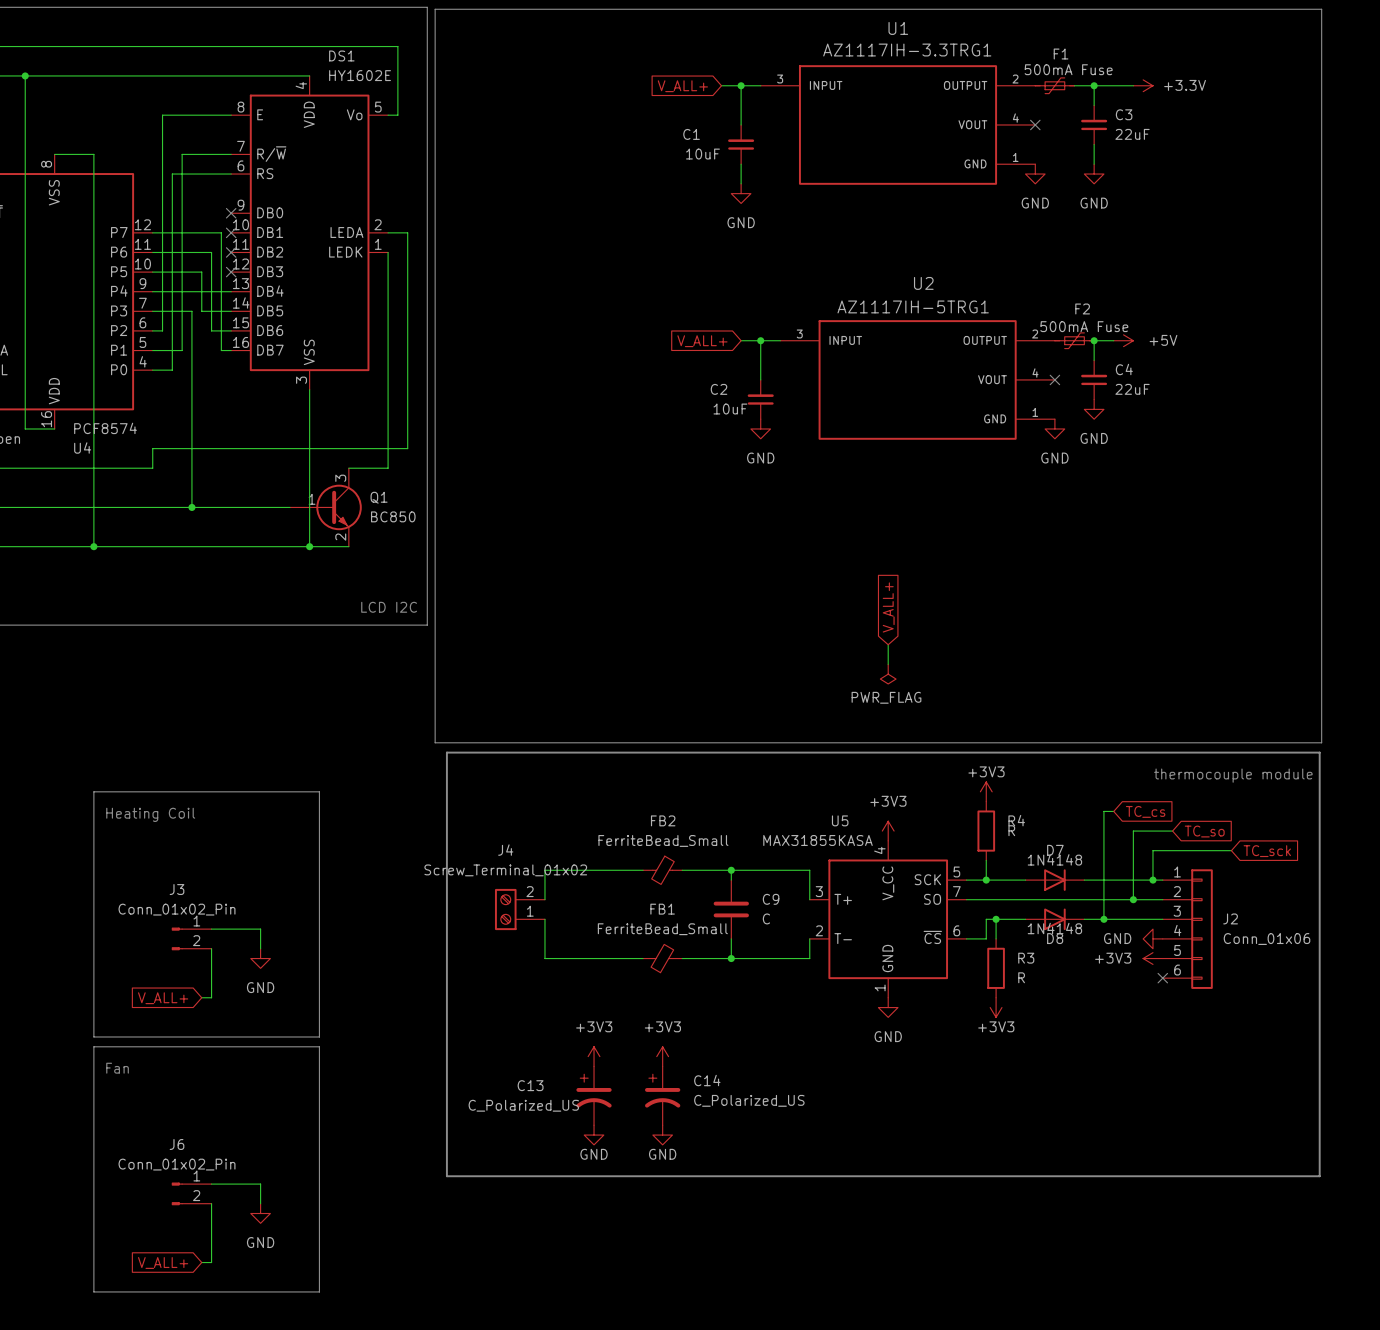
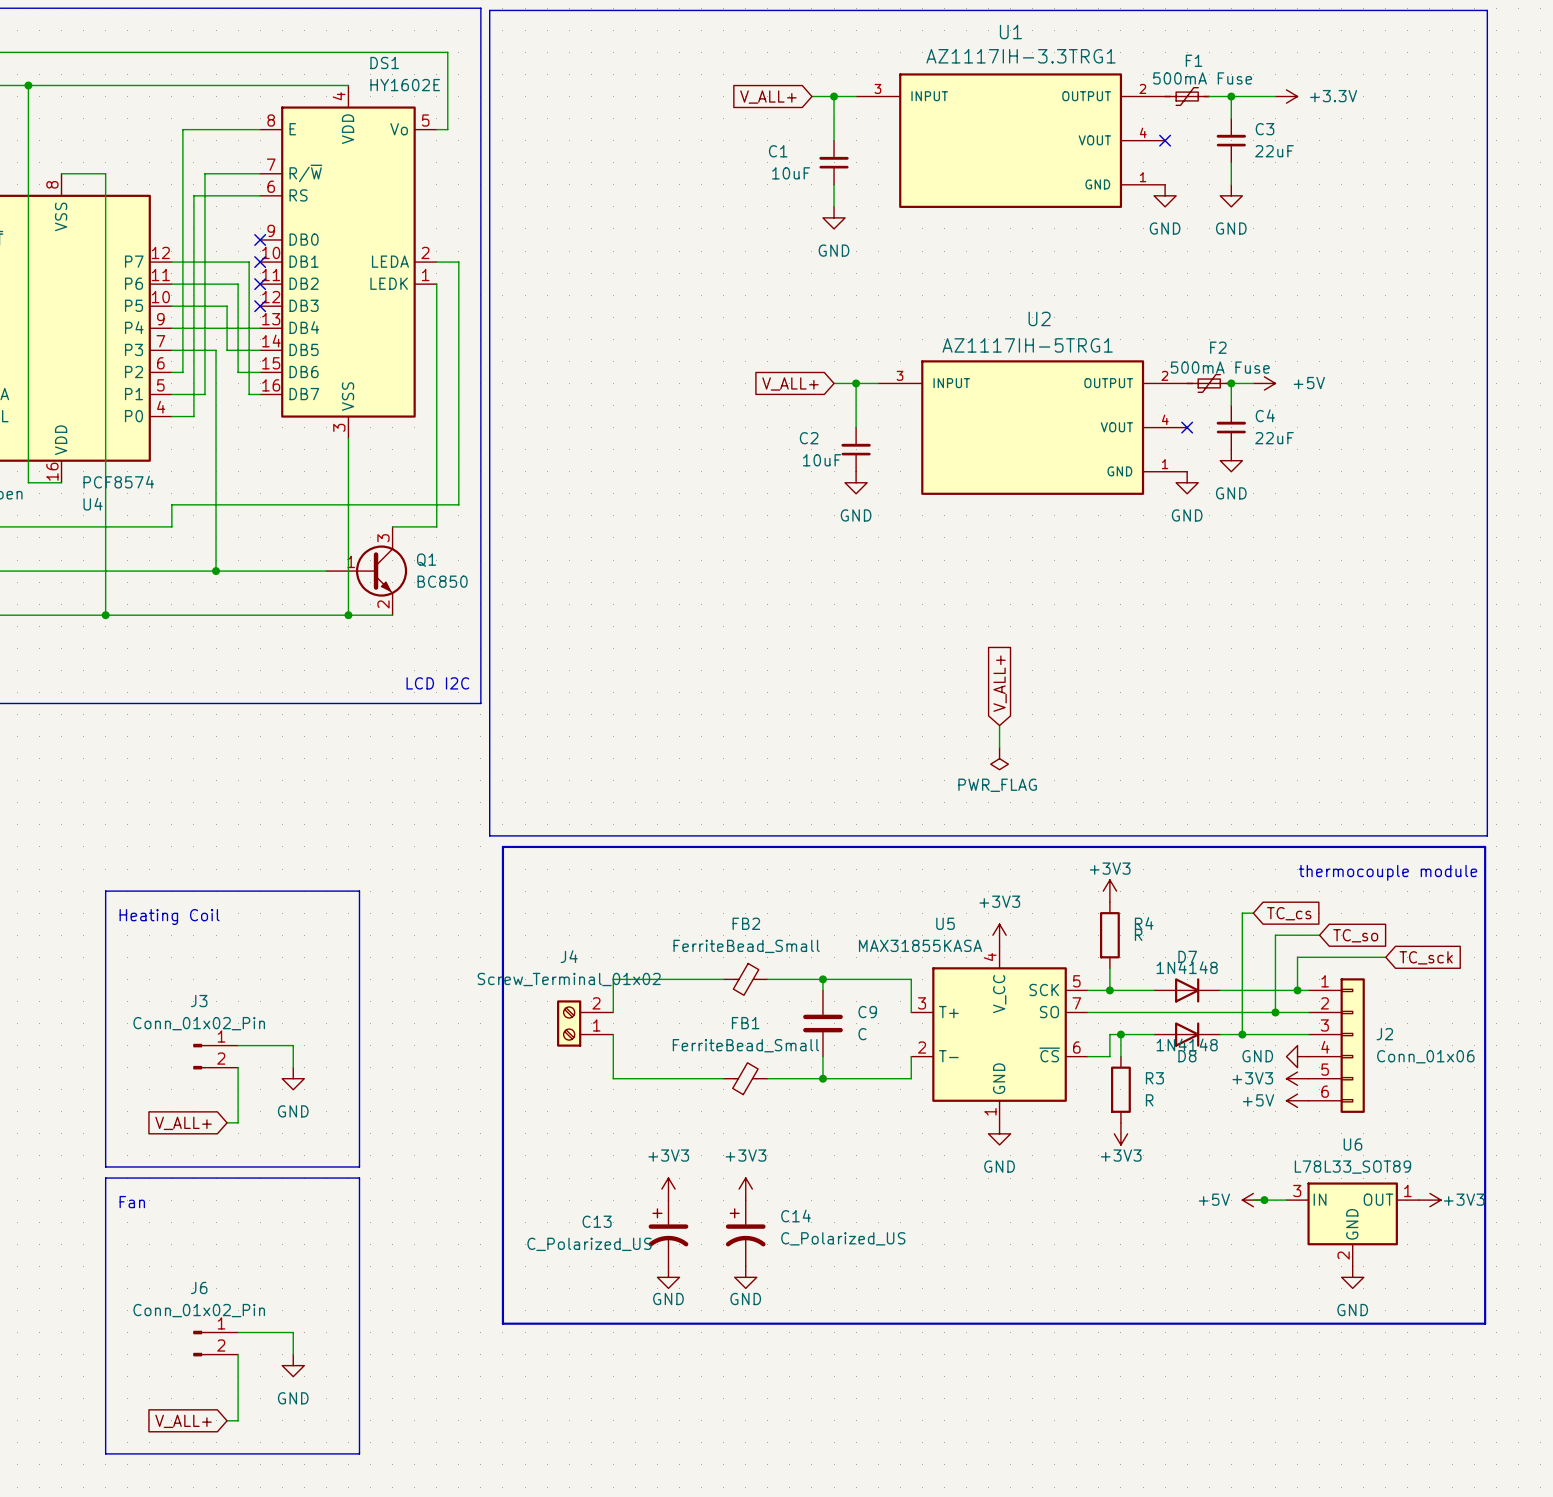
power symbol: none -> +5V (1297, 1100)
no-connect mark: (1162, 978) -> none
wire: none -> (1253, 1200) (1286, 1200)
power symbol: none -> +5V (1253, 1200)
junction: none -> (1264, 1200)
power symbol: none -> +3V3 (1429, 1200)
U6: none -> L78L33_SOT89 (1352, 1224)
power symbol: none -> GND (1352, 1277)

